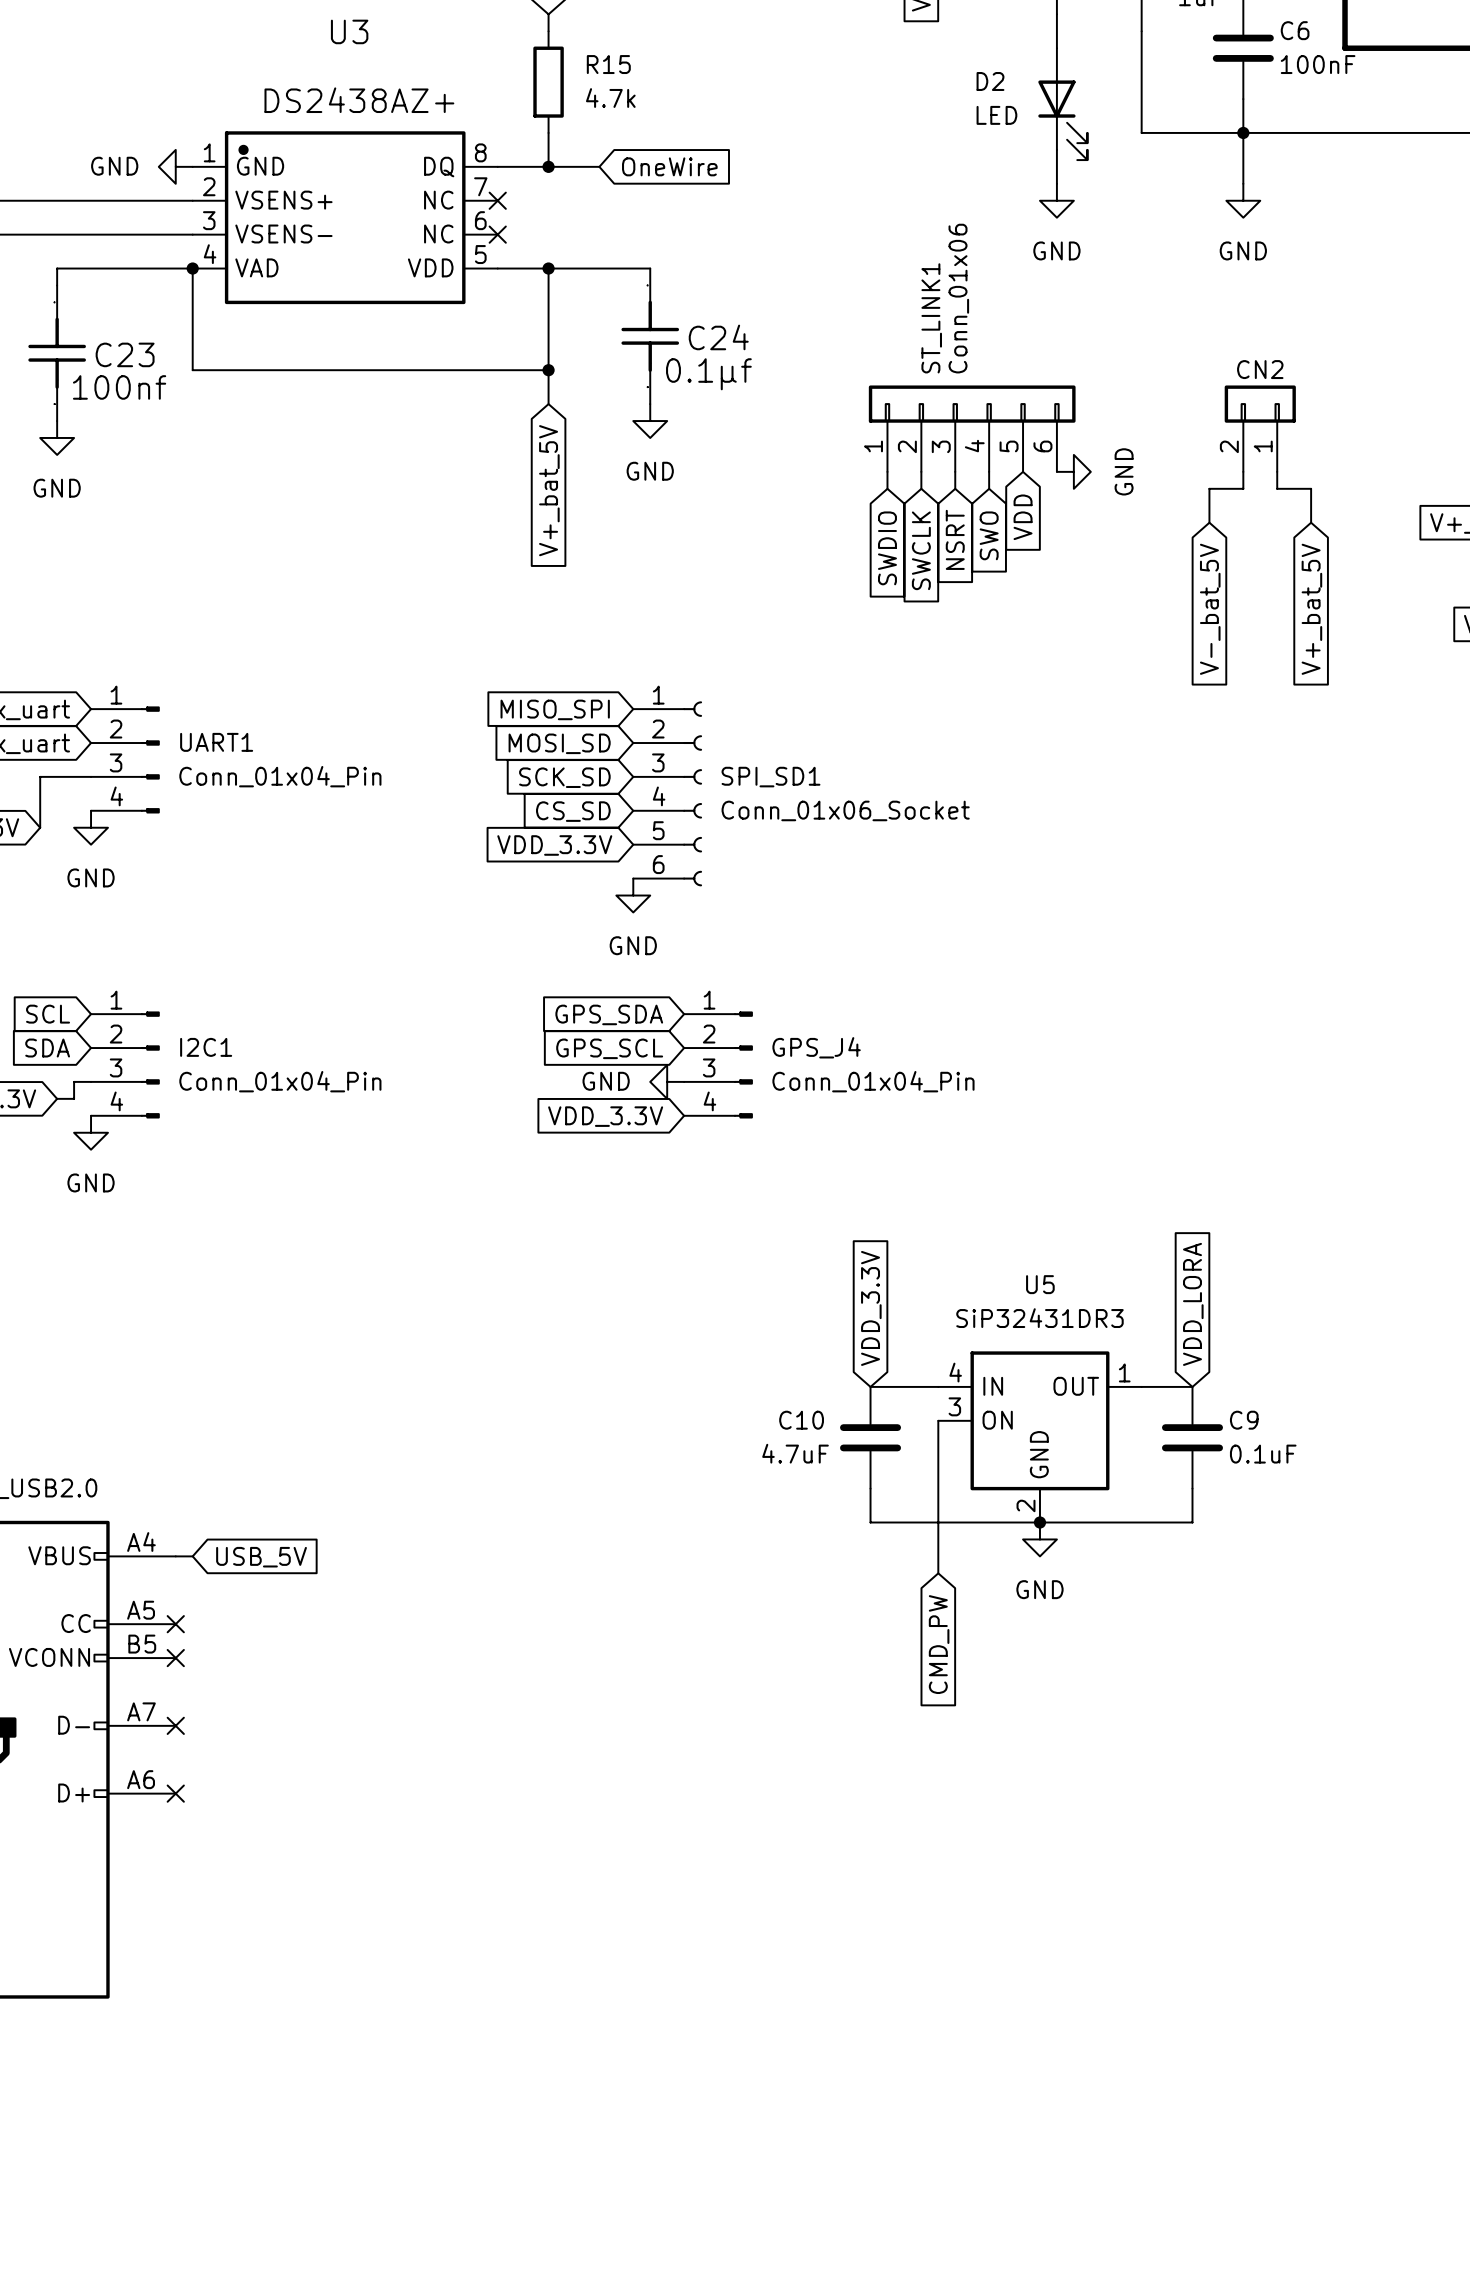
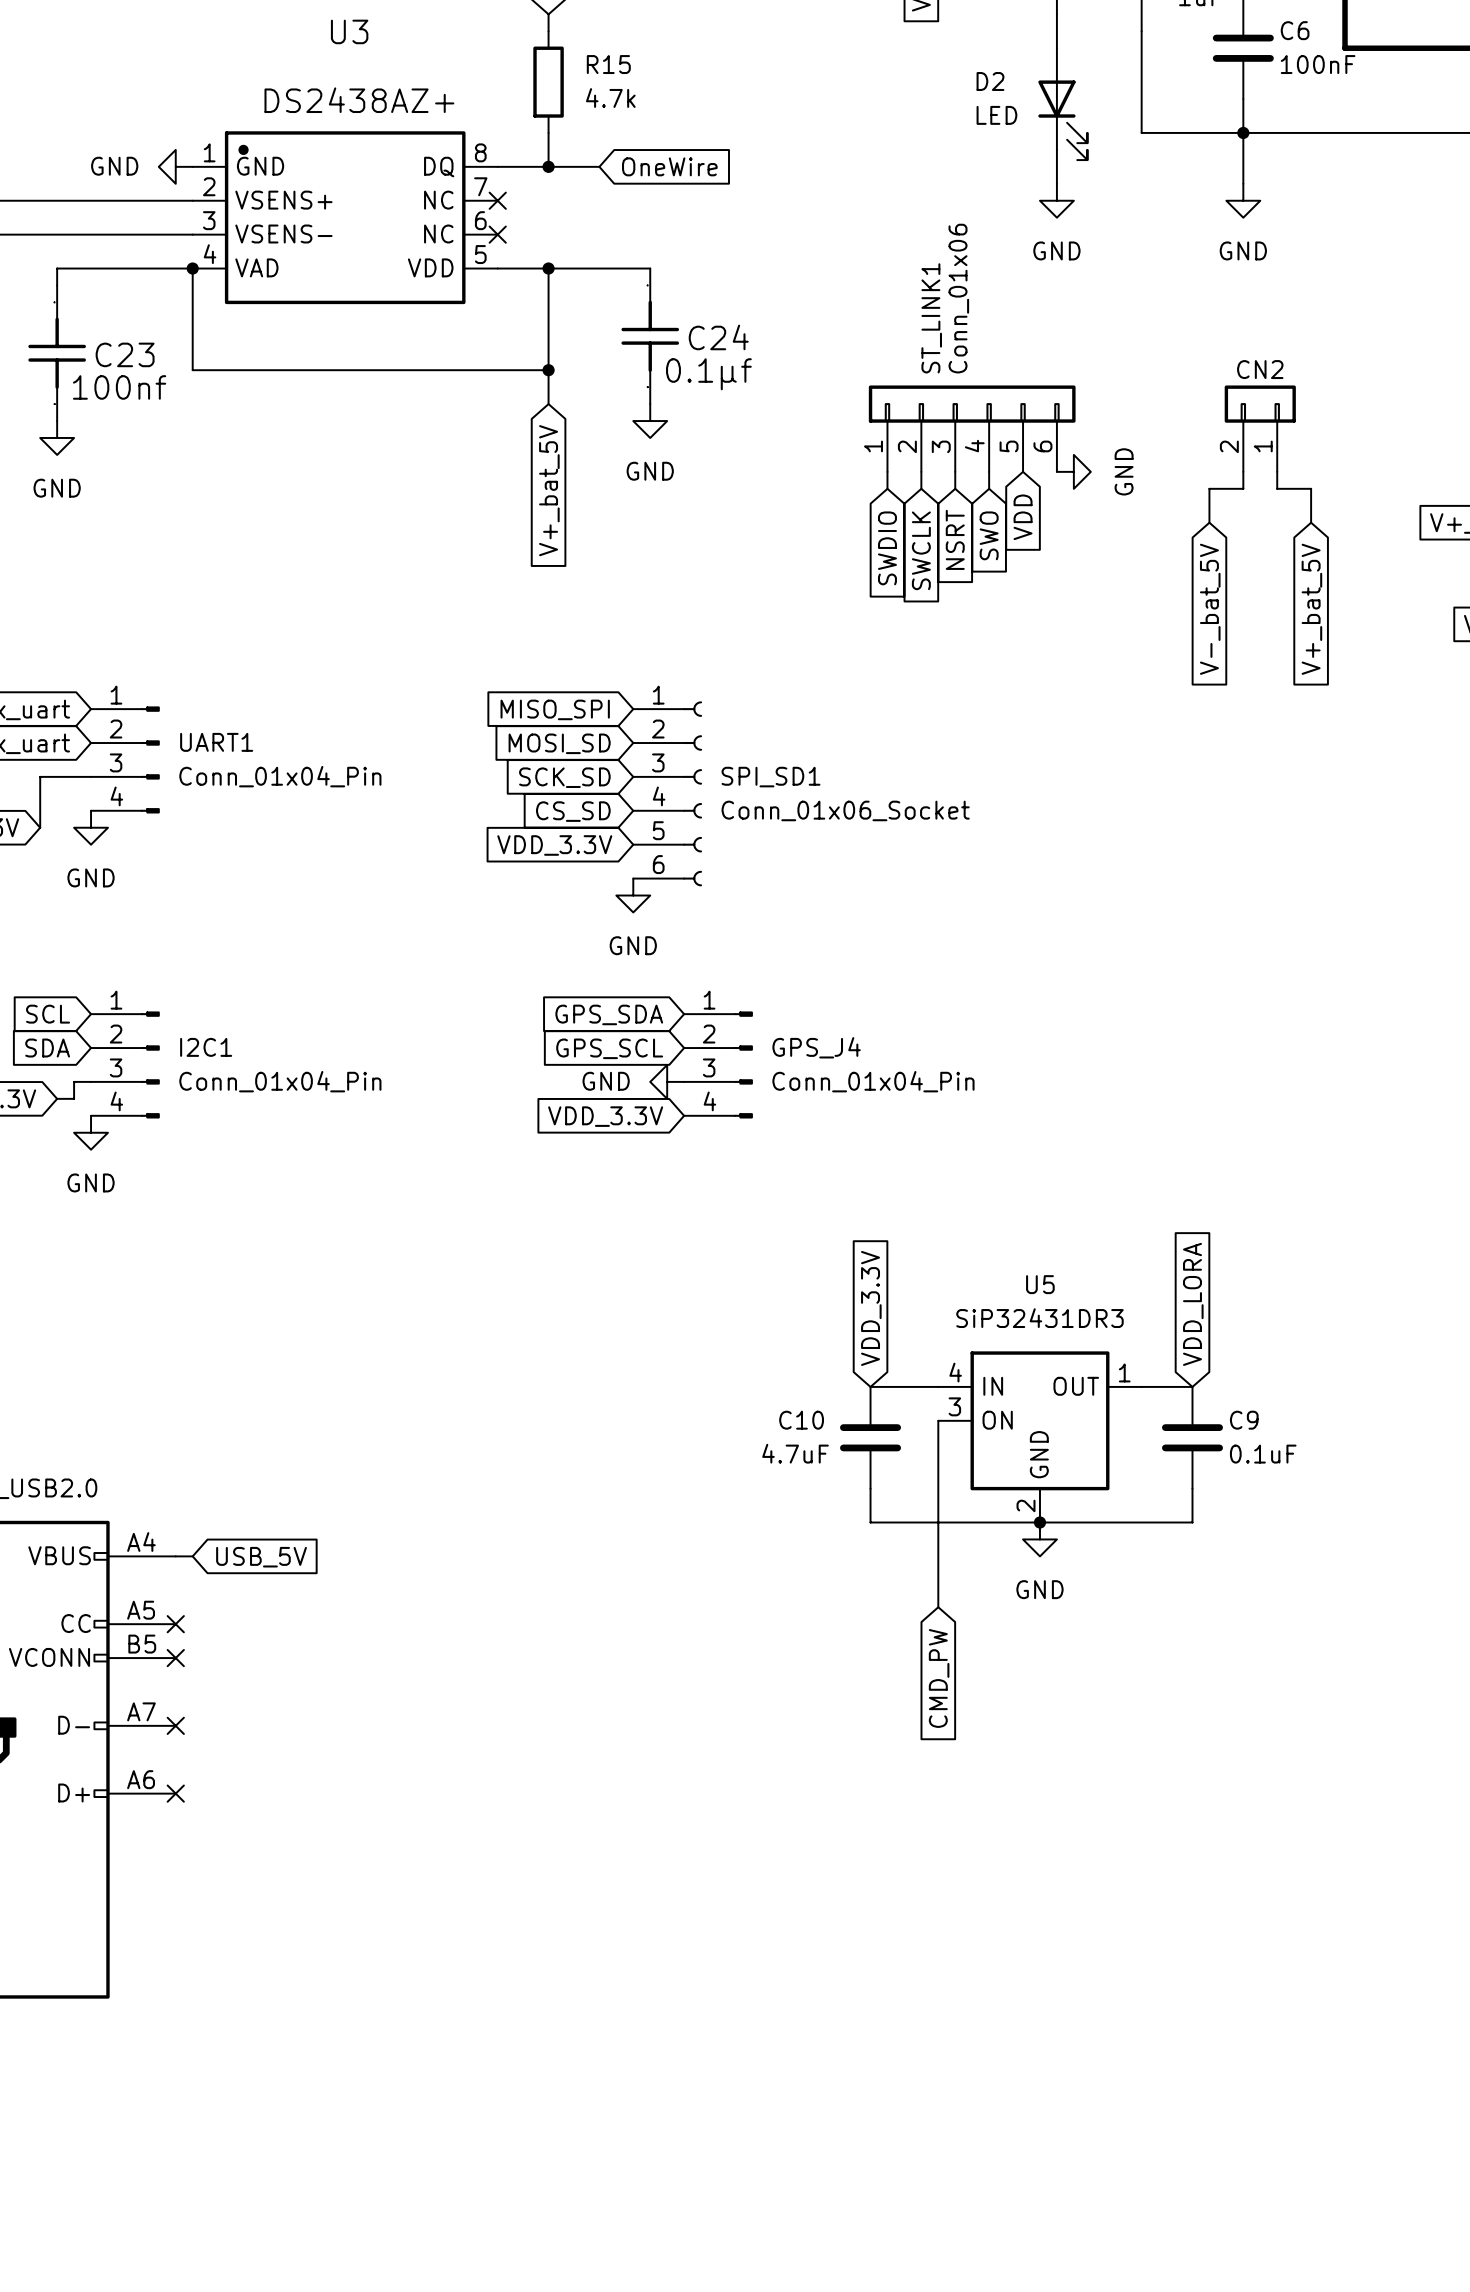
wire: none -> (938, 1573) (938, 1607)
global label position: CMD_PW (939, 1644) -> CMD_PW (939, 1678)

